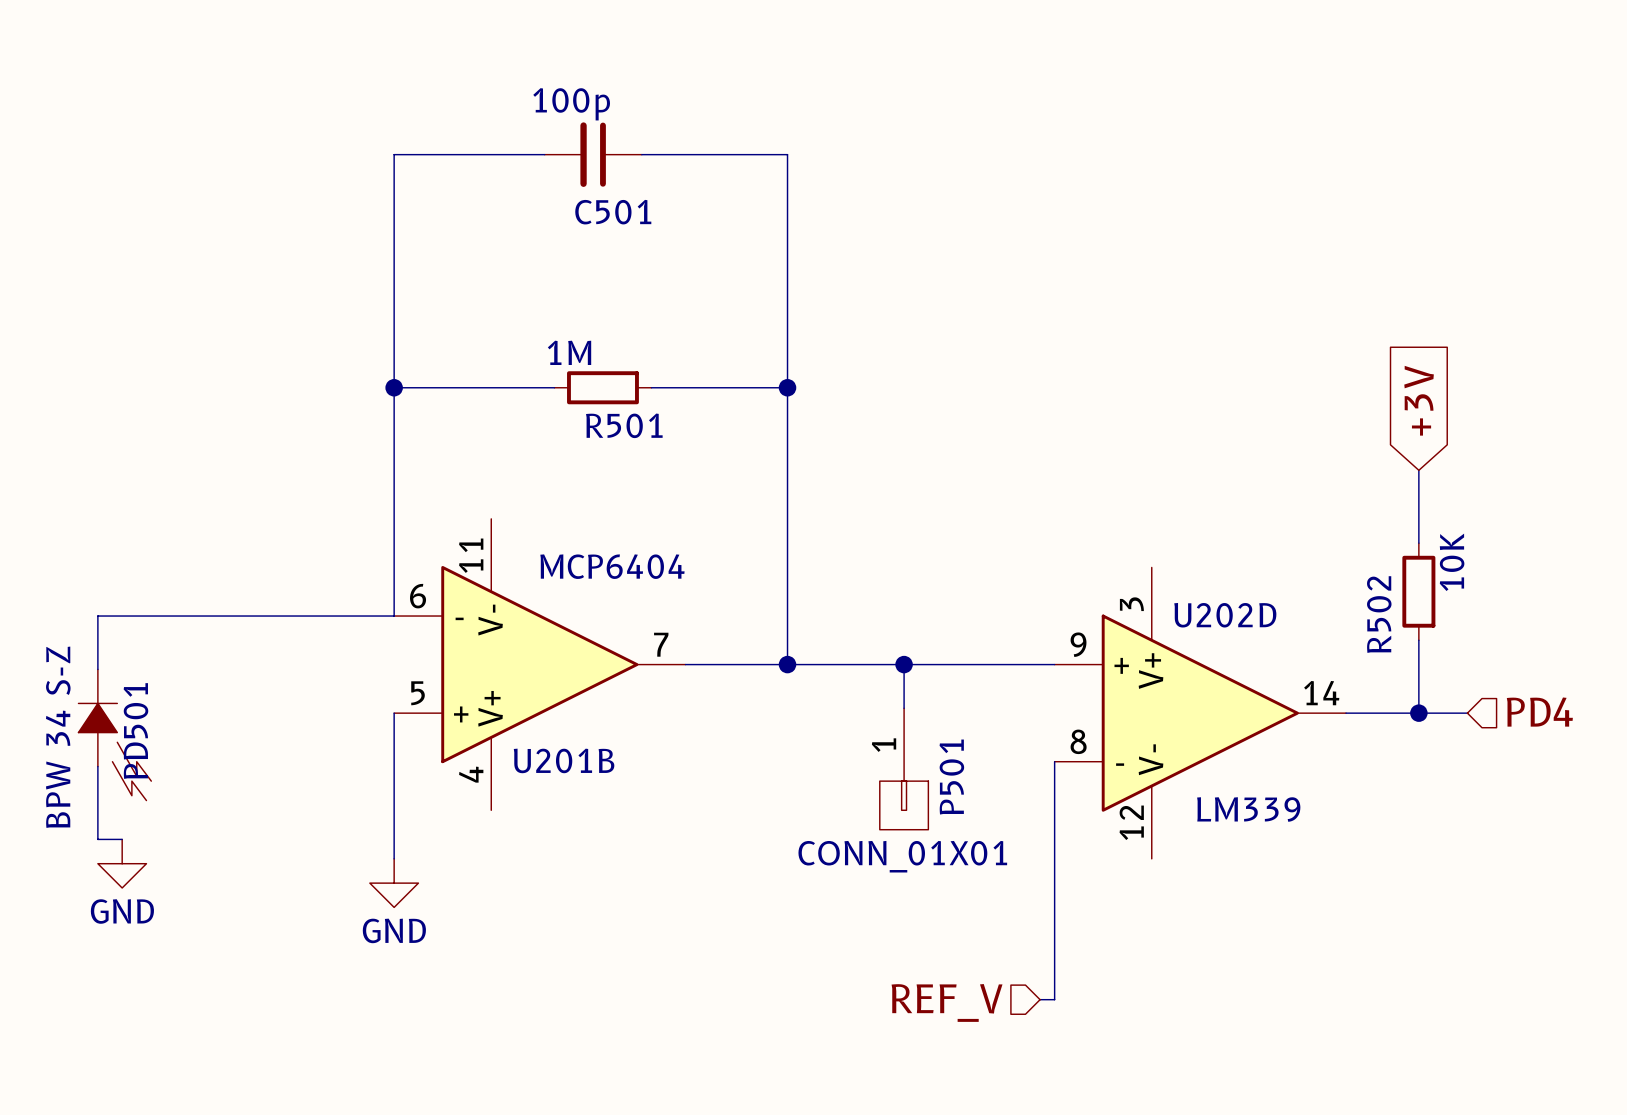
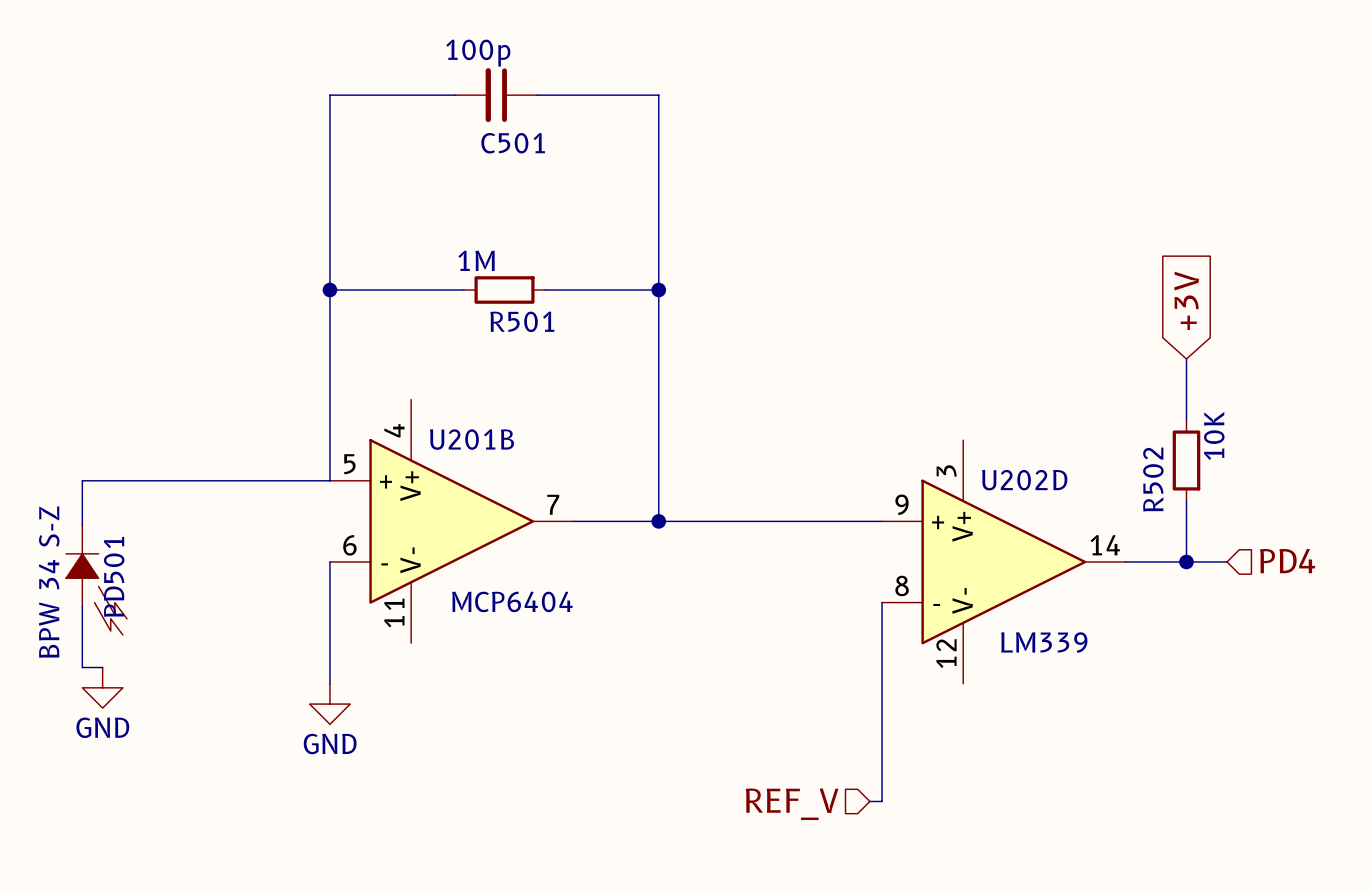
U201B flip: as is (539, 664) -> up-down (451, 521)
wire: (904, 664) (904, 708) -> none
junction: (904, 664) -> none
P501: CONN_01X01 (904, 768) -> none

